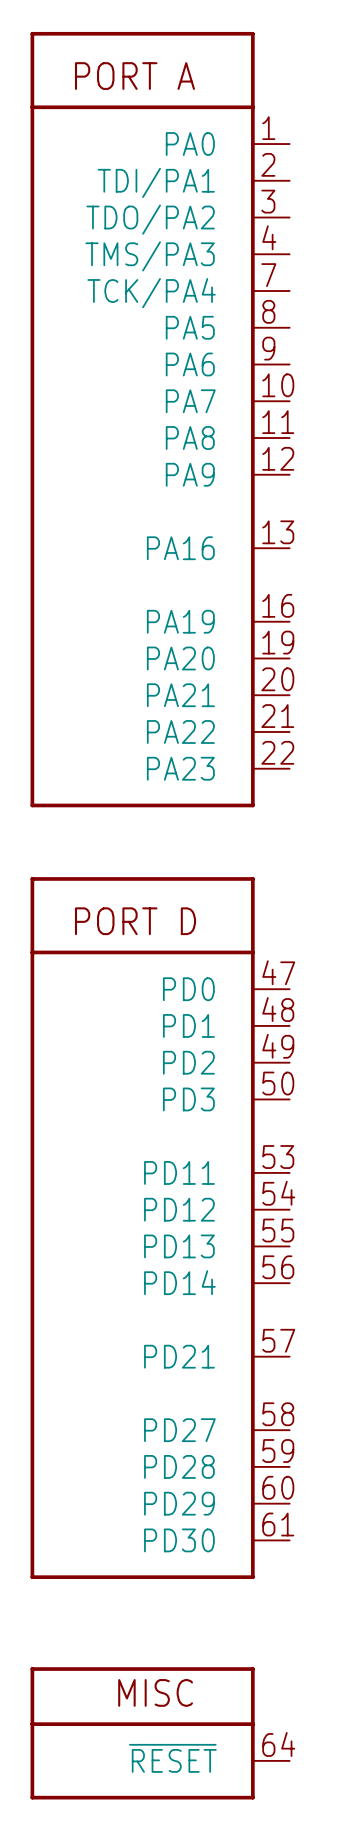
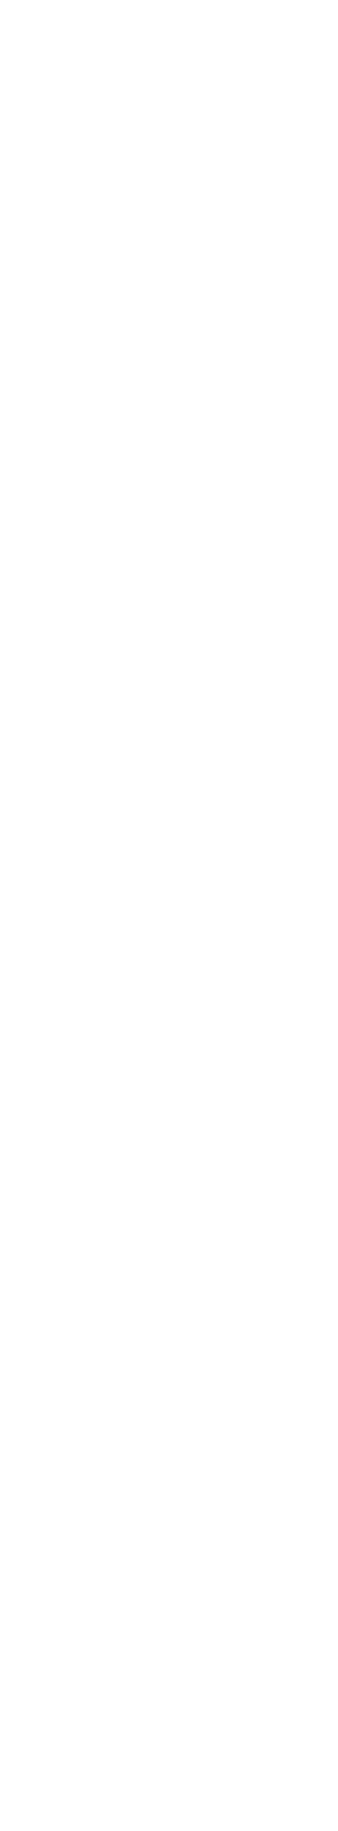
part: (160, 419) -> none
part: (160, 1228) -> none
part: (160, 1733) -> none

